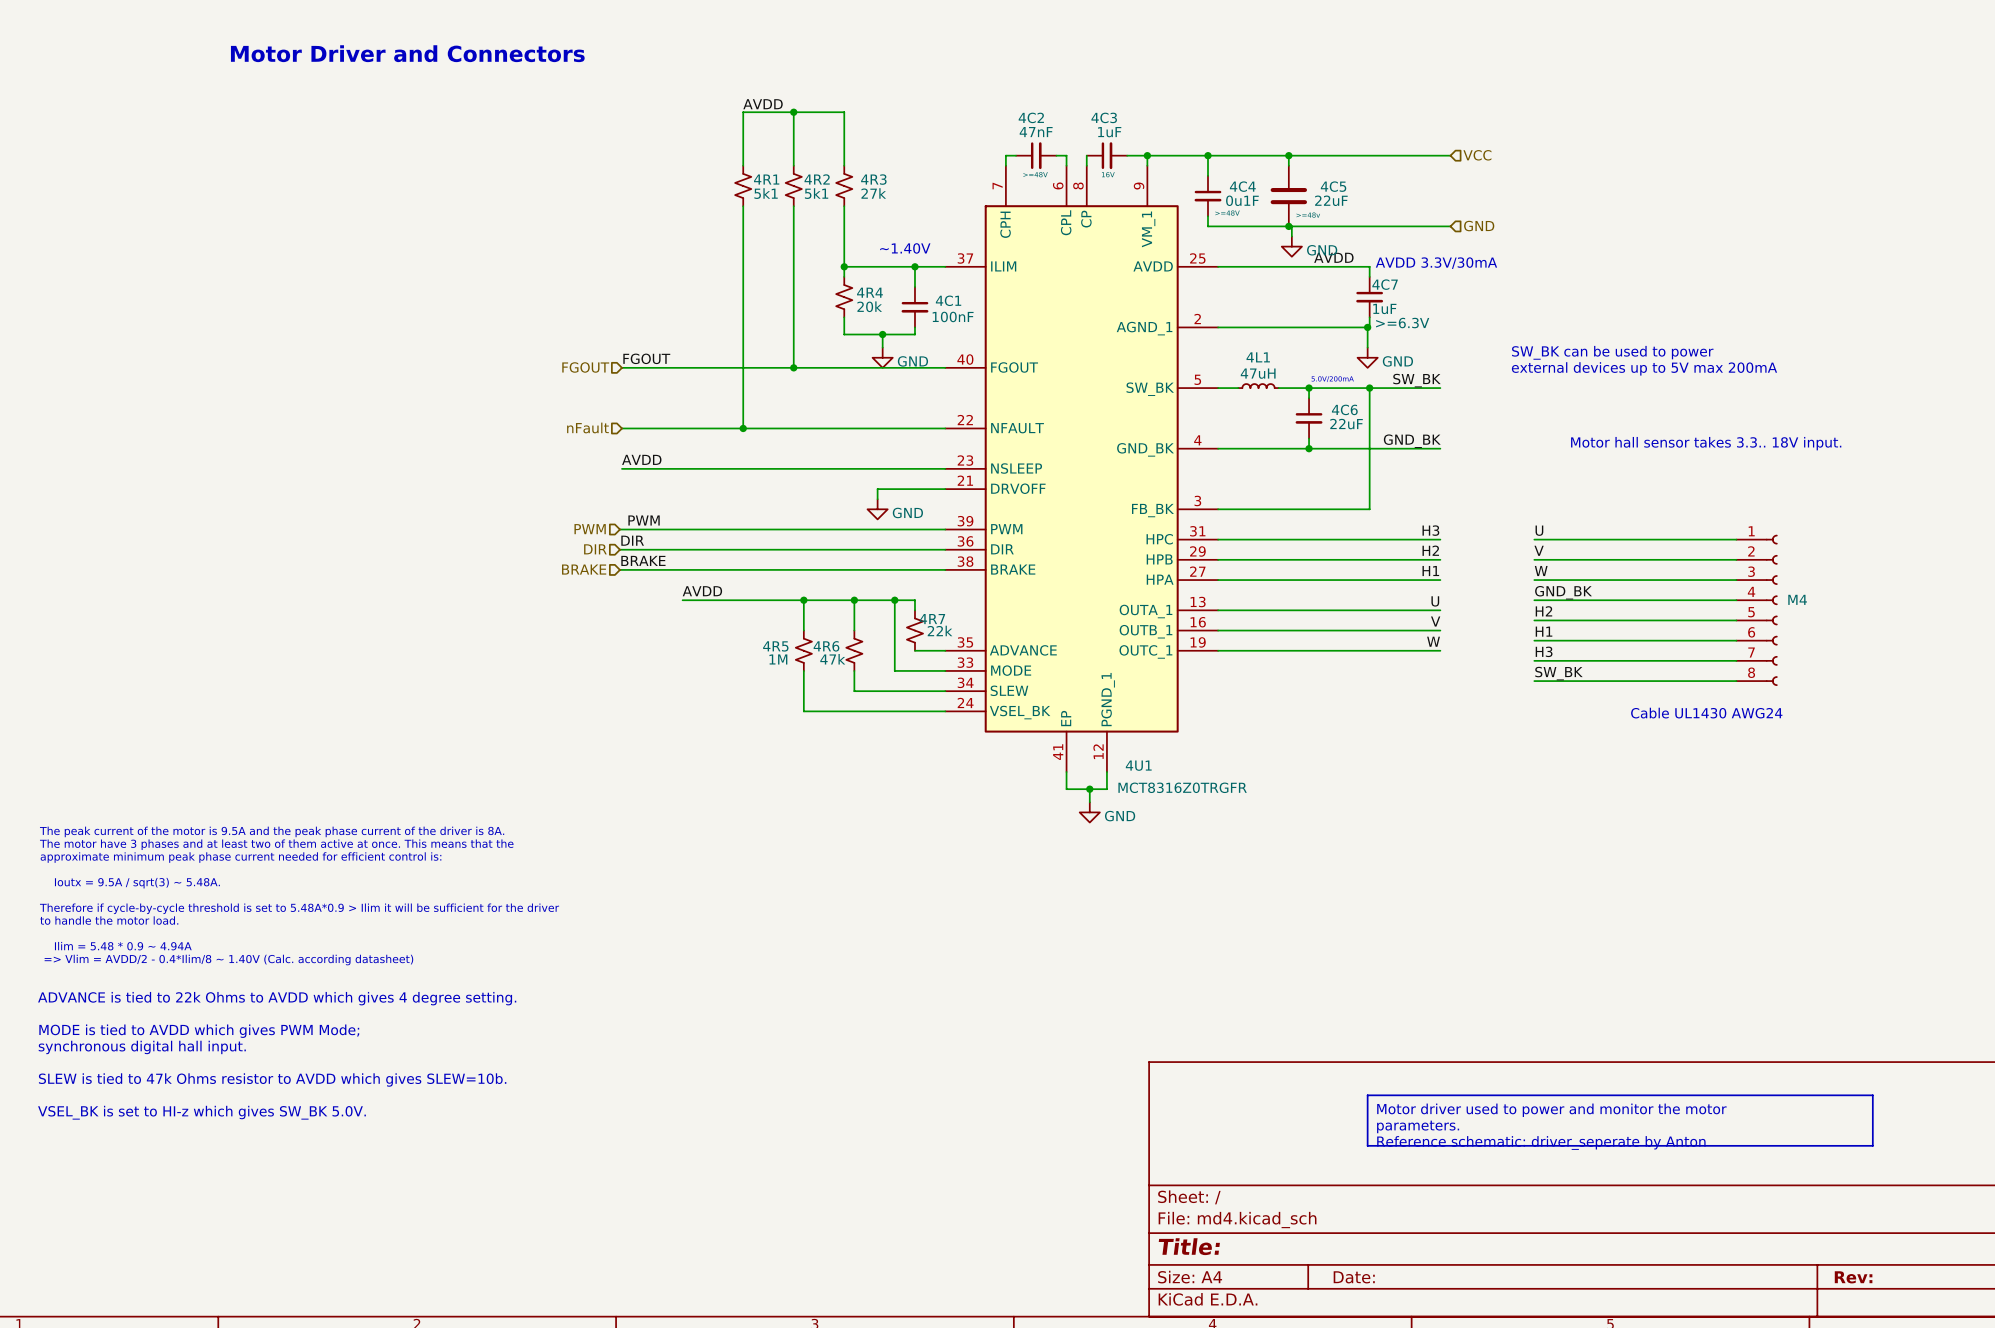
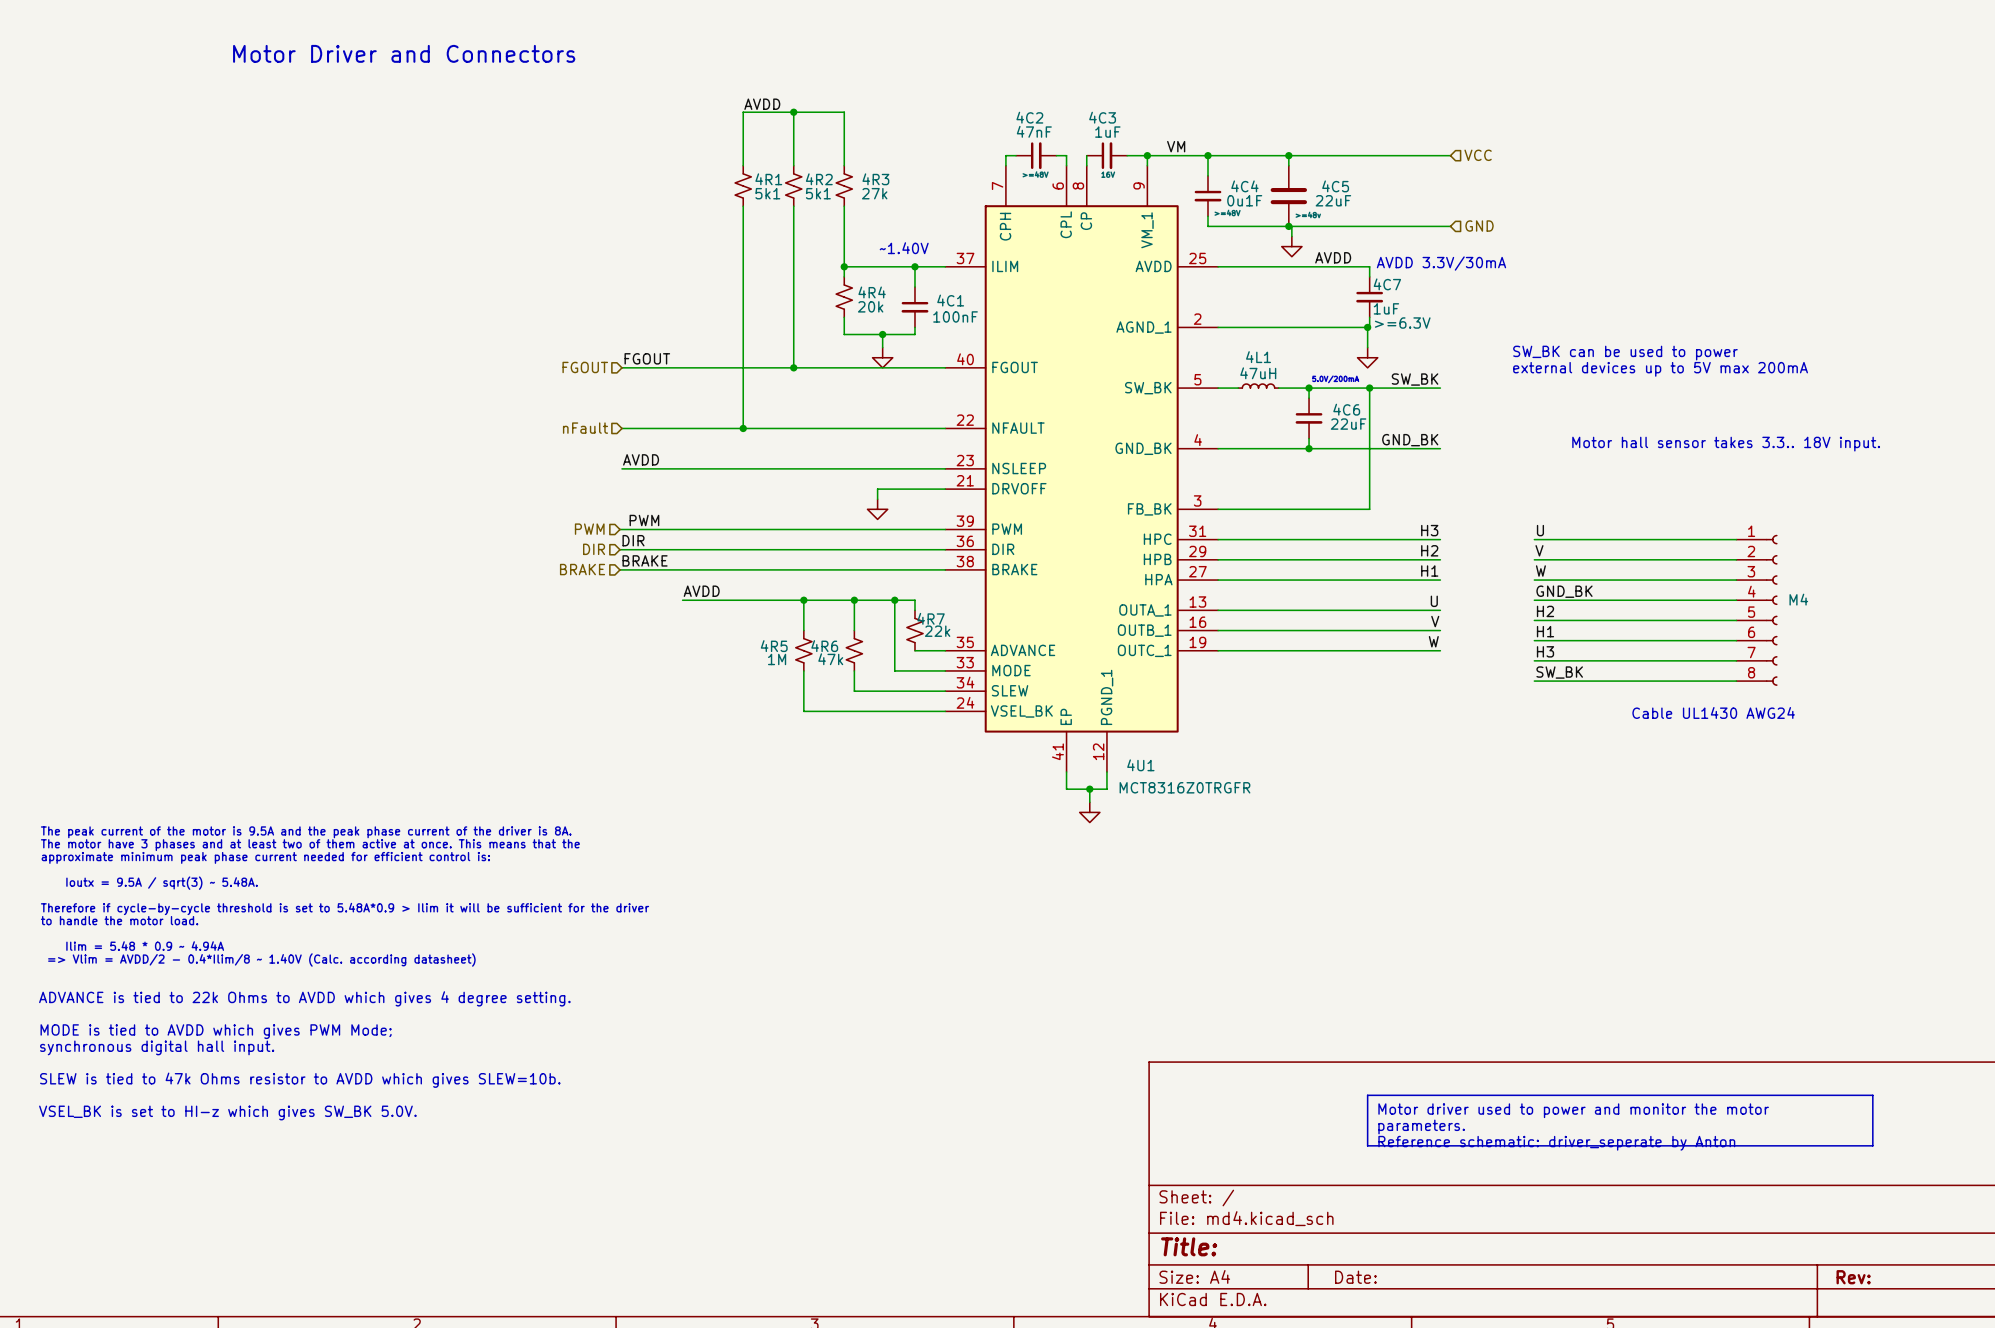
label: none -> VM (1176, 146)
power symbol text: GND (1322, 250) -> none
power symbol text: GND (912, 361) -> none
power symbol text: GND (1397, 361) -> none
power symbol text: GND (907, 512) -> none
power symbol text: GND (1120, 816) -> none

